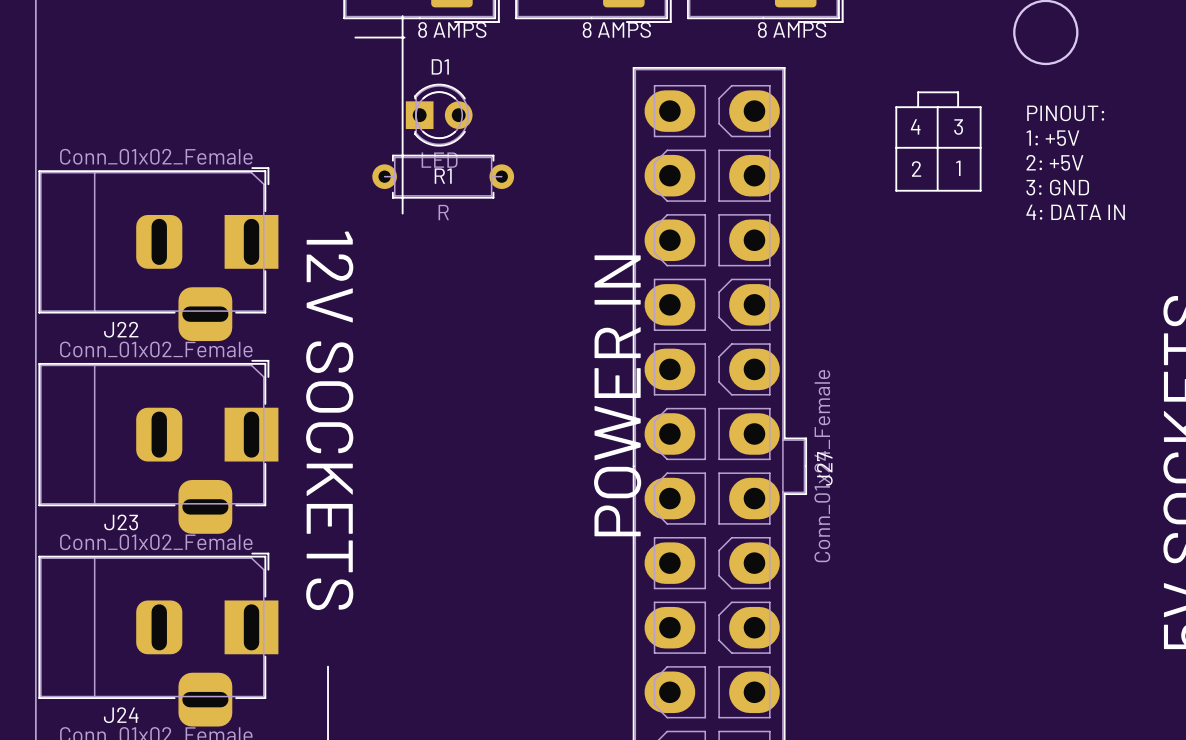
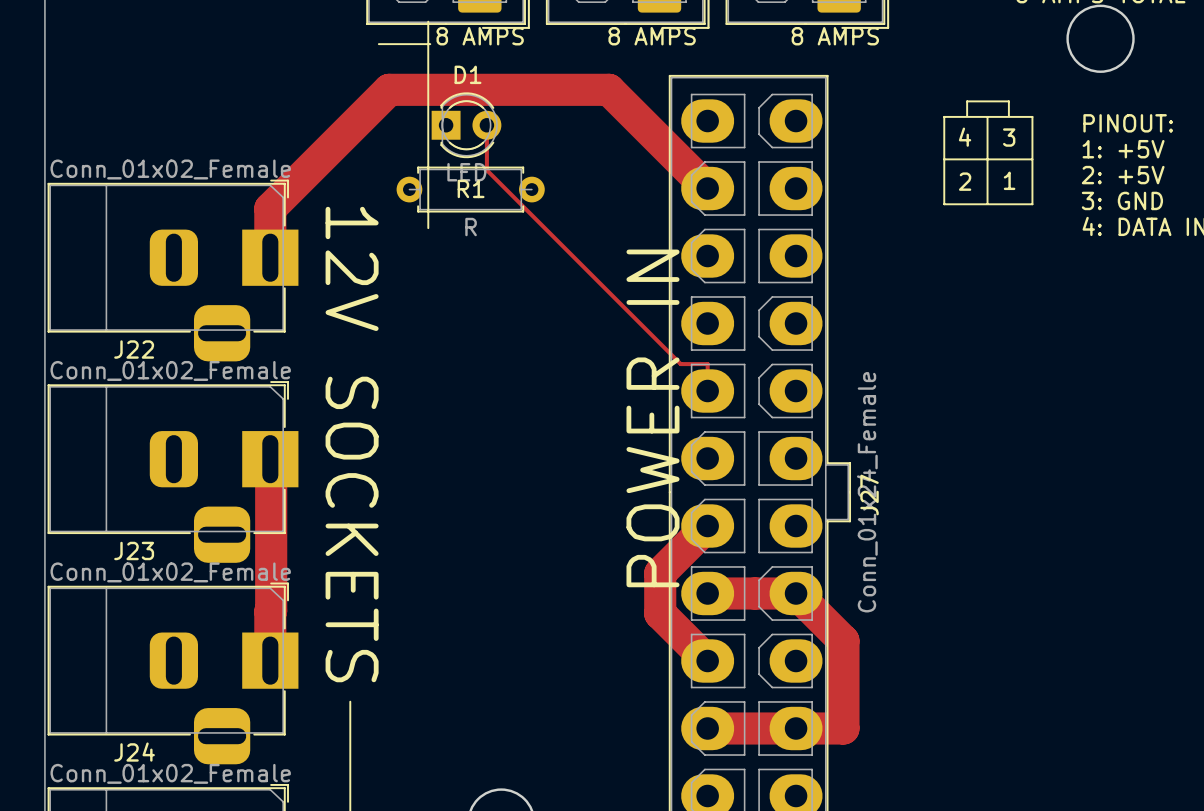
track: none -> (486, 125) (486, 170) (680, 364) (707, 364) (707, 391)
track: none -> (707, 188) (608, 89) (389, 89) (270, 208) (270, 257)
track: none -> (270, 459) (270, 660)
track: none -> (707, 526) (660, 573) (660, 613) (707, 661)
track: none -> (707, 593) (796, 593) (843, 640) (843, 728) (707, 728)

